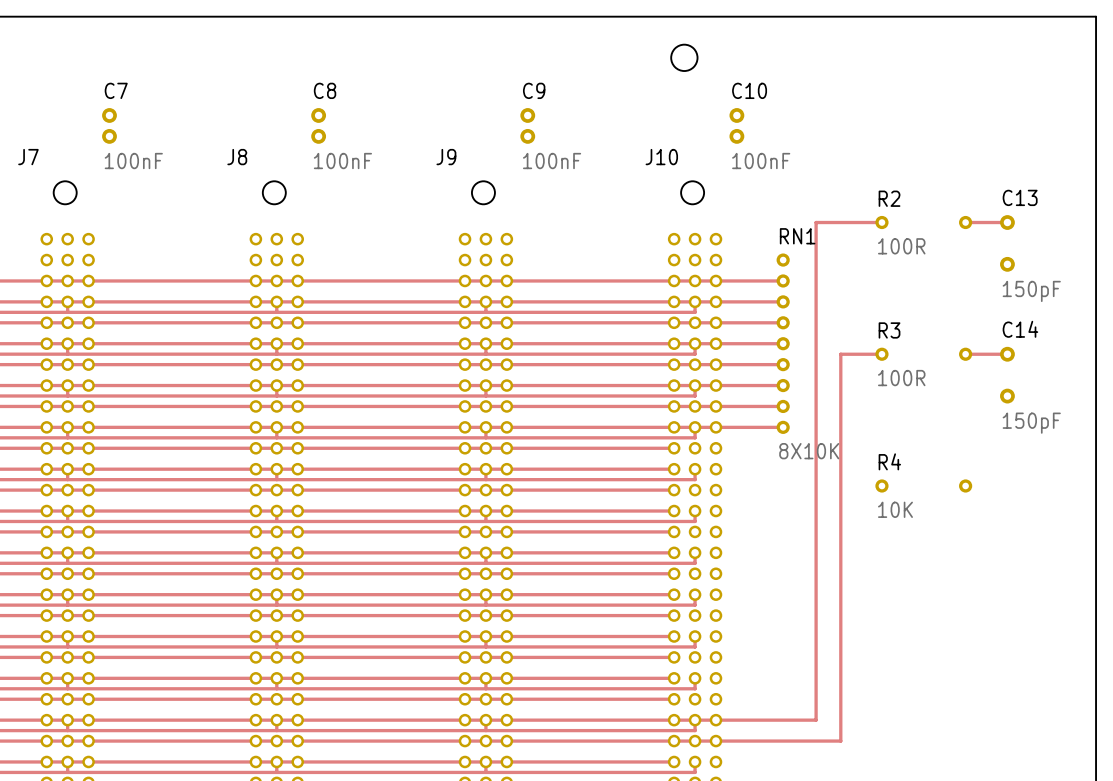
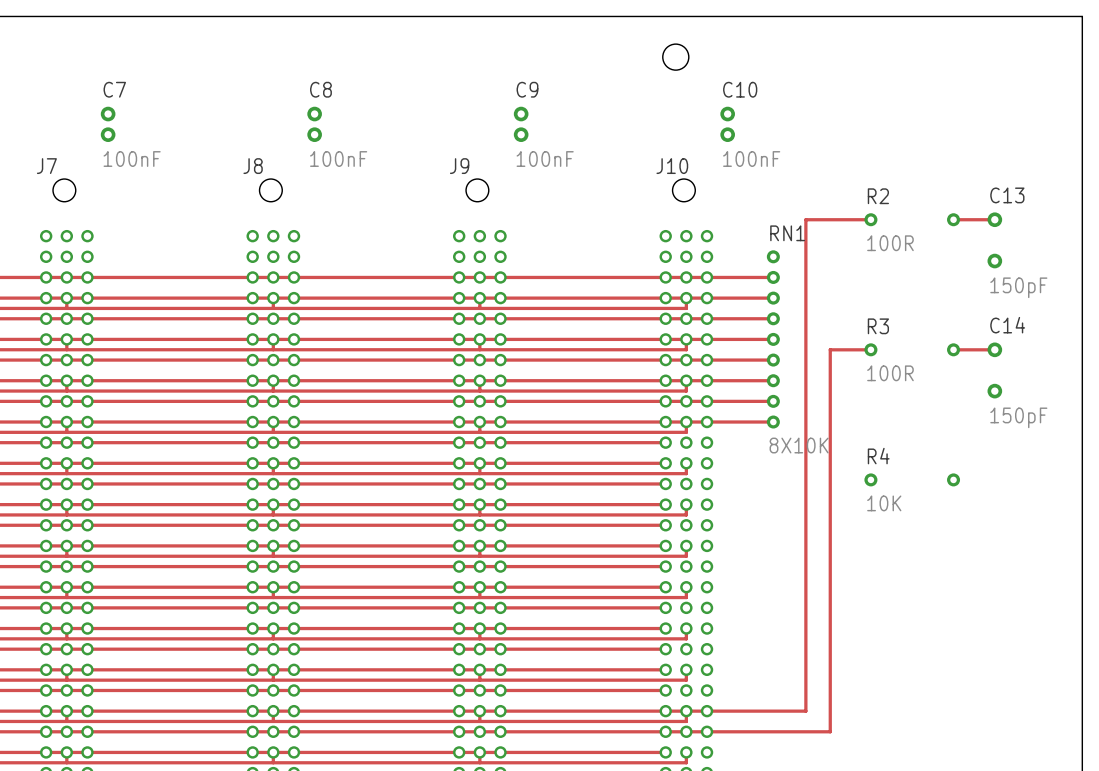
J7 name position: J7 (28, 157) -> J7 (46, 166)
J8 name position: J8 (237, 157) -> J8 (253, 166)
J9 name position: J9 (446, 157) -> J9 (459, 166)
J10 name position: J10 (661, 157) -> J10 (672, 166)

